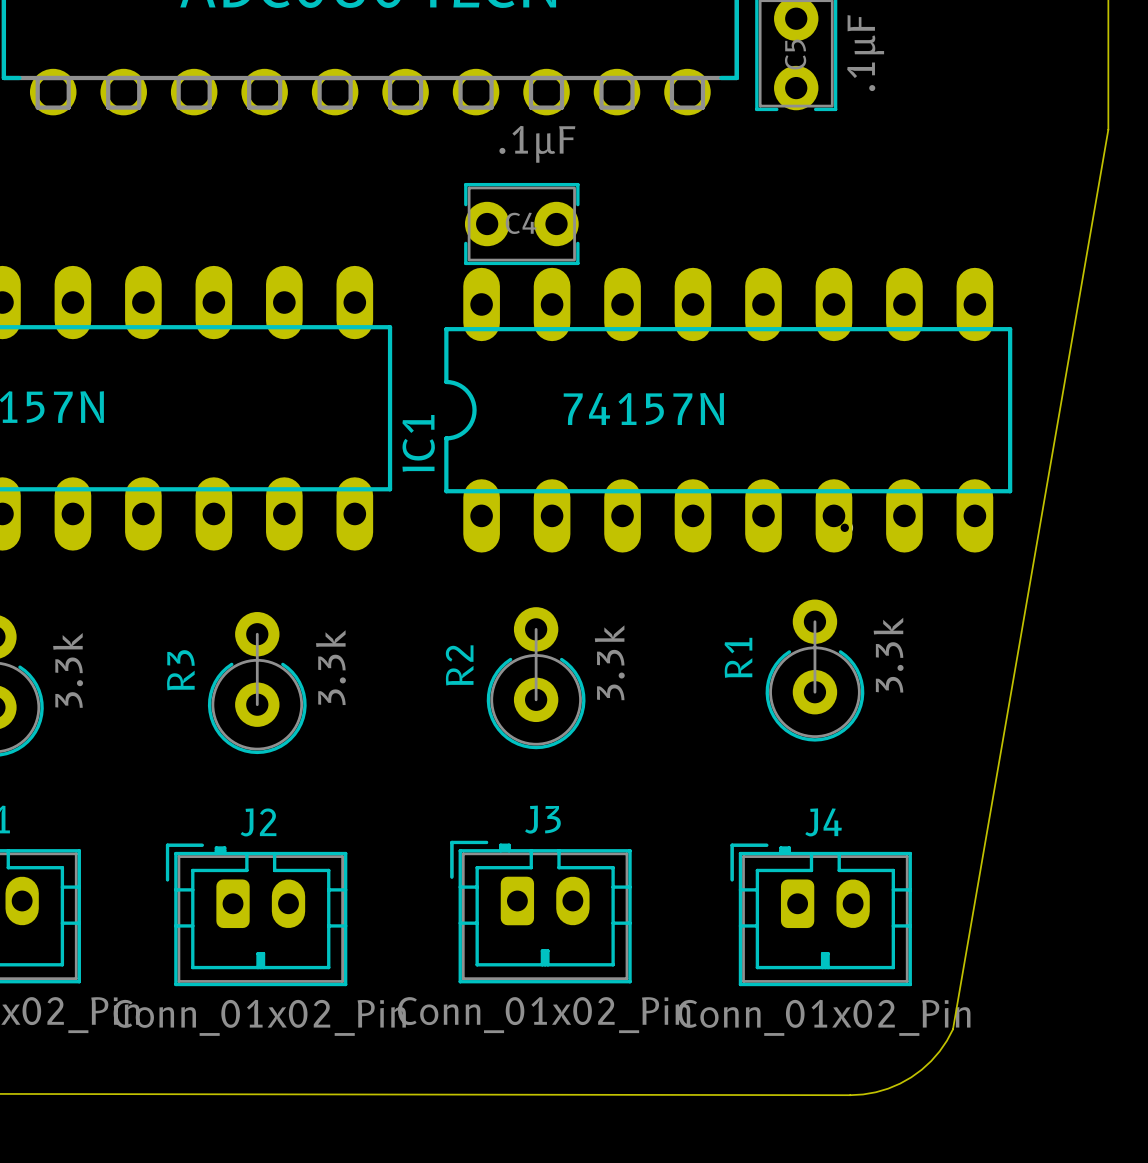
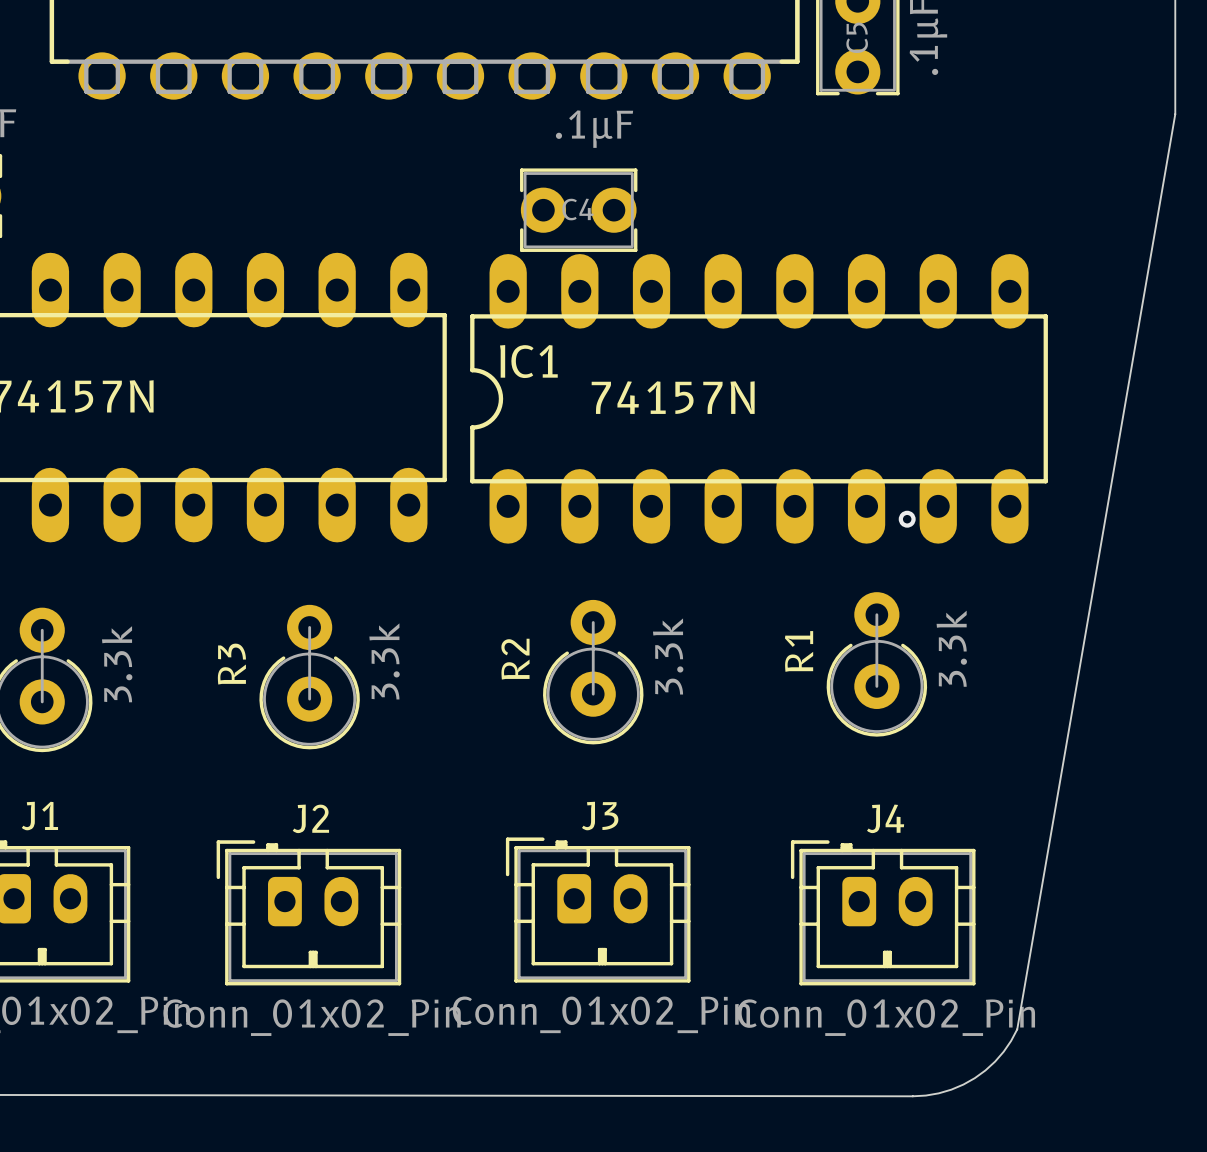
IC1 position: (728, 410) -> (759, 398)
IC1 name rotation: 0° (418, 443) -> 90° clockwise (528, 361)

